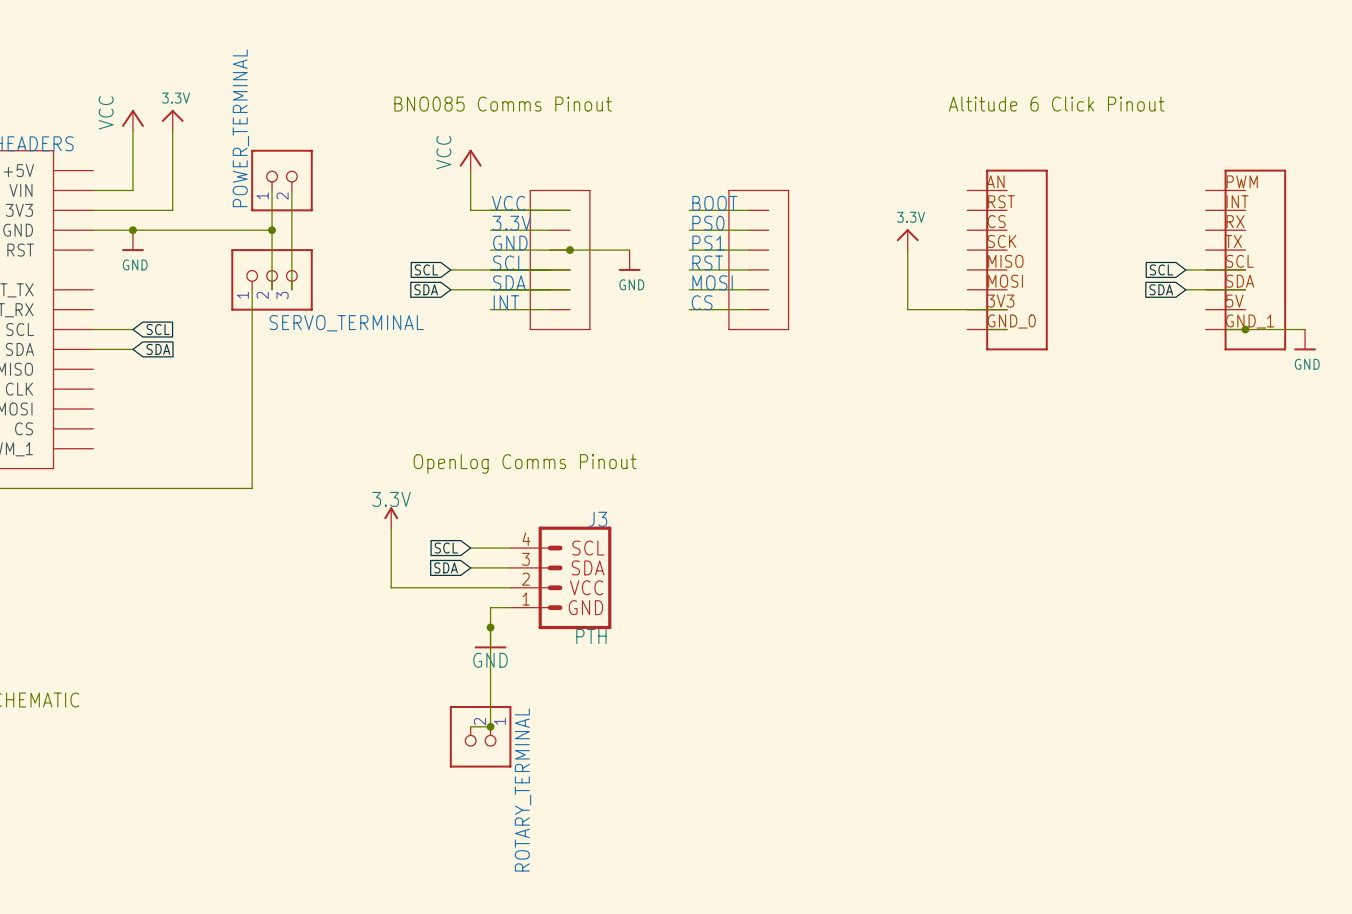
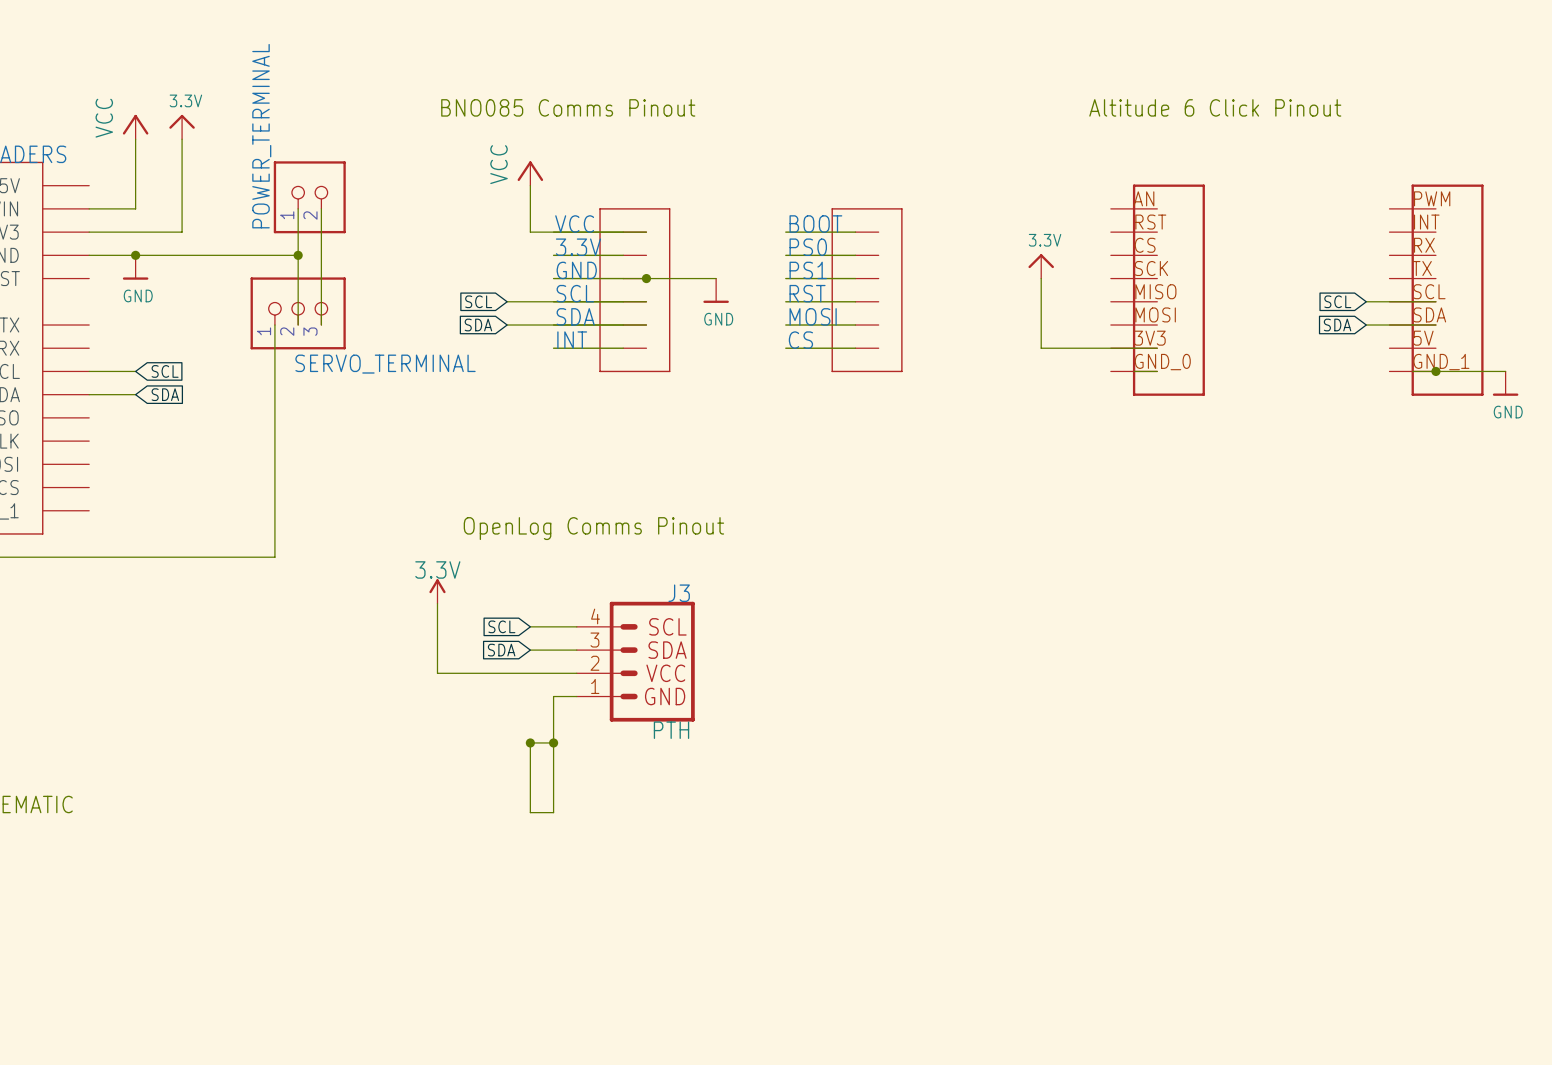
junction: (490, 627) -> none
power symbol: GND (490, 637) -> none
junction: none -> (530, 742)
junction: none -> (553, 742)
wire: (490, 706) (490, 726) (470, 726) -> (553, 812) (530, 812) (530, 742) (553, 742)
junction: (490, 726) -> none
ROTARY_TERMINAL: (480, 736) -> none

